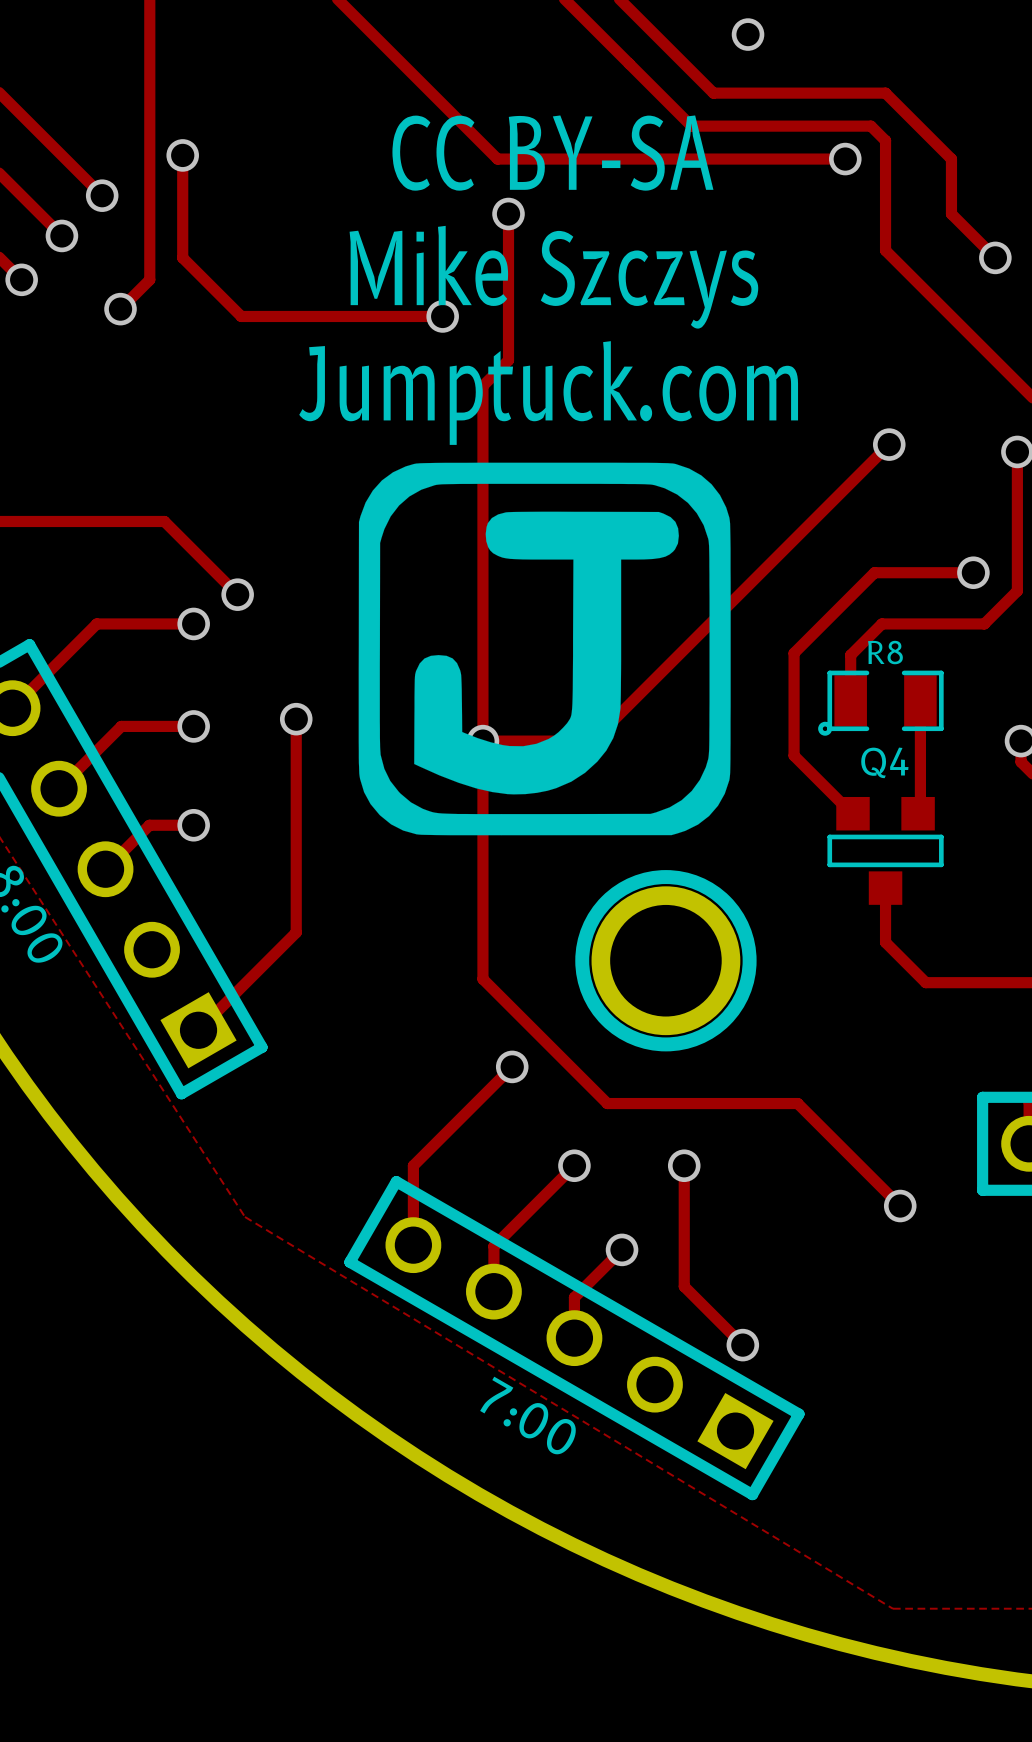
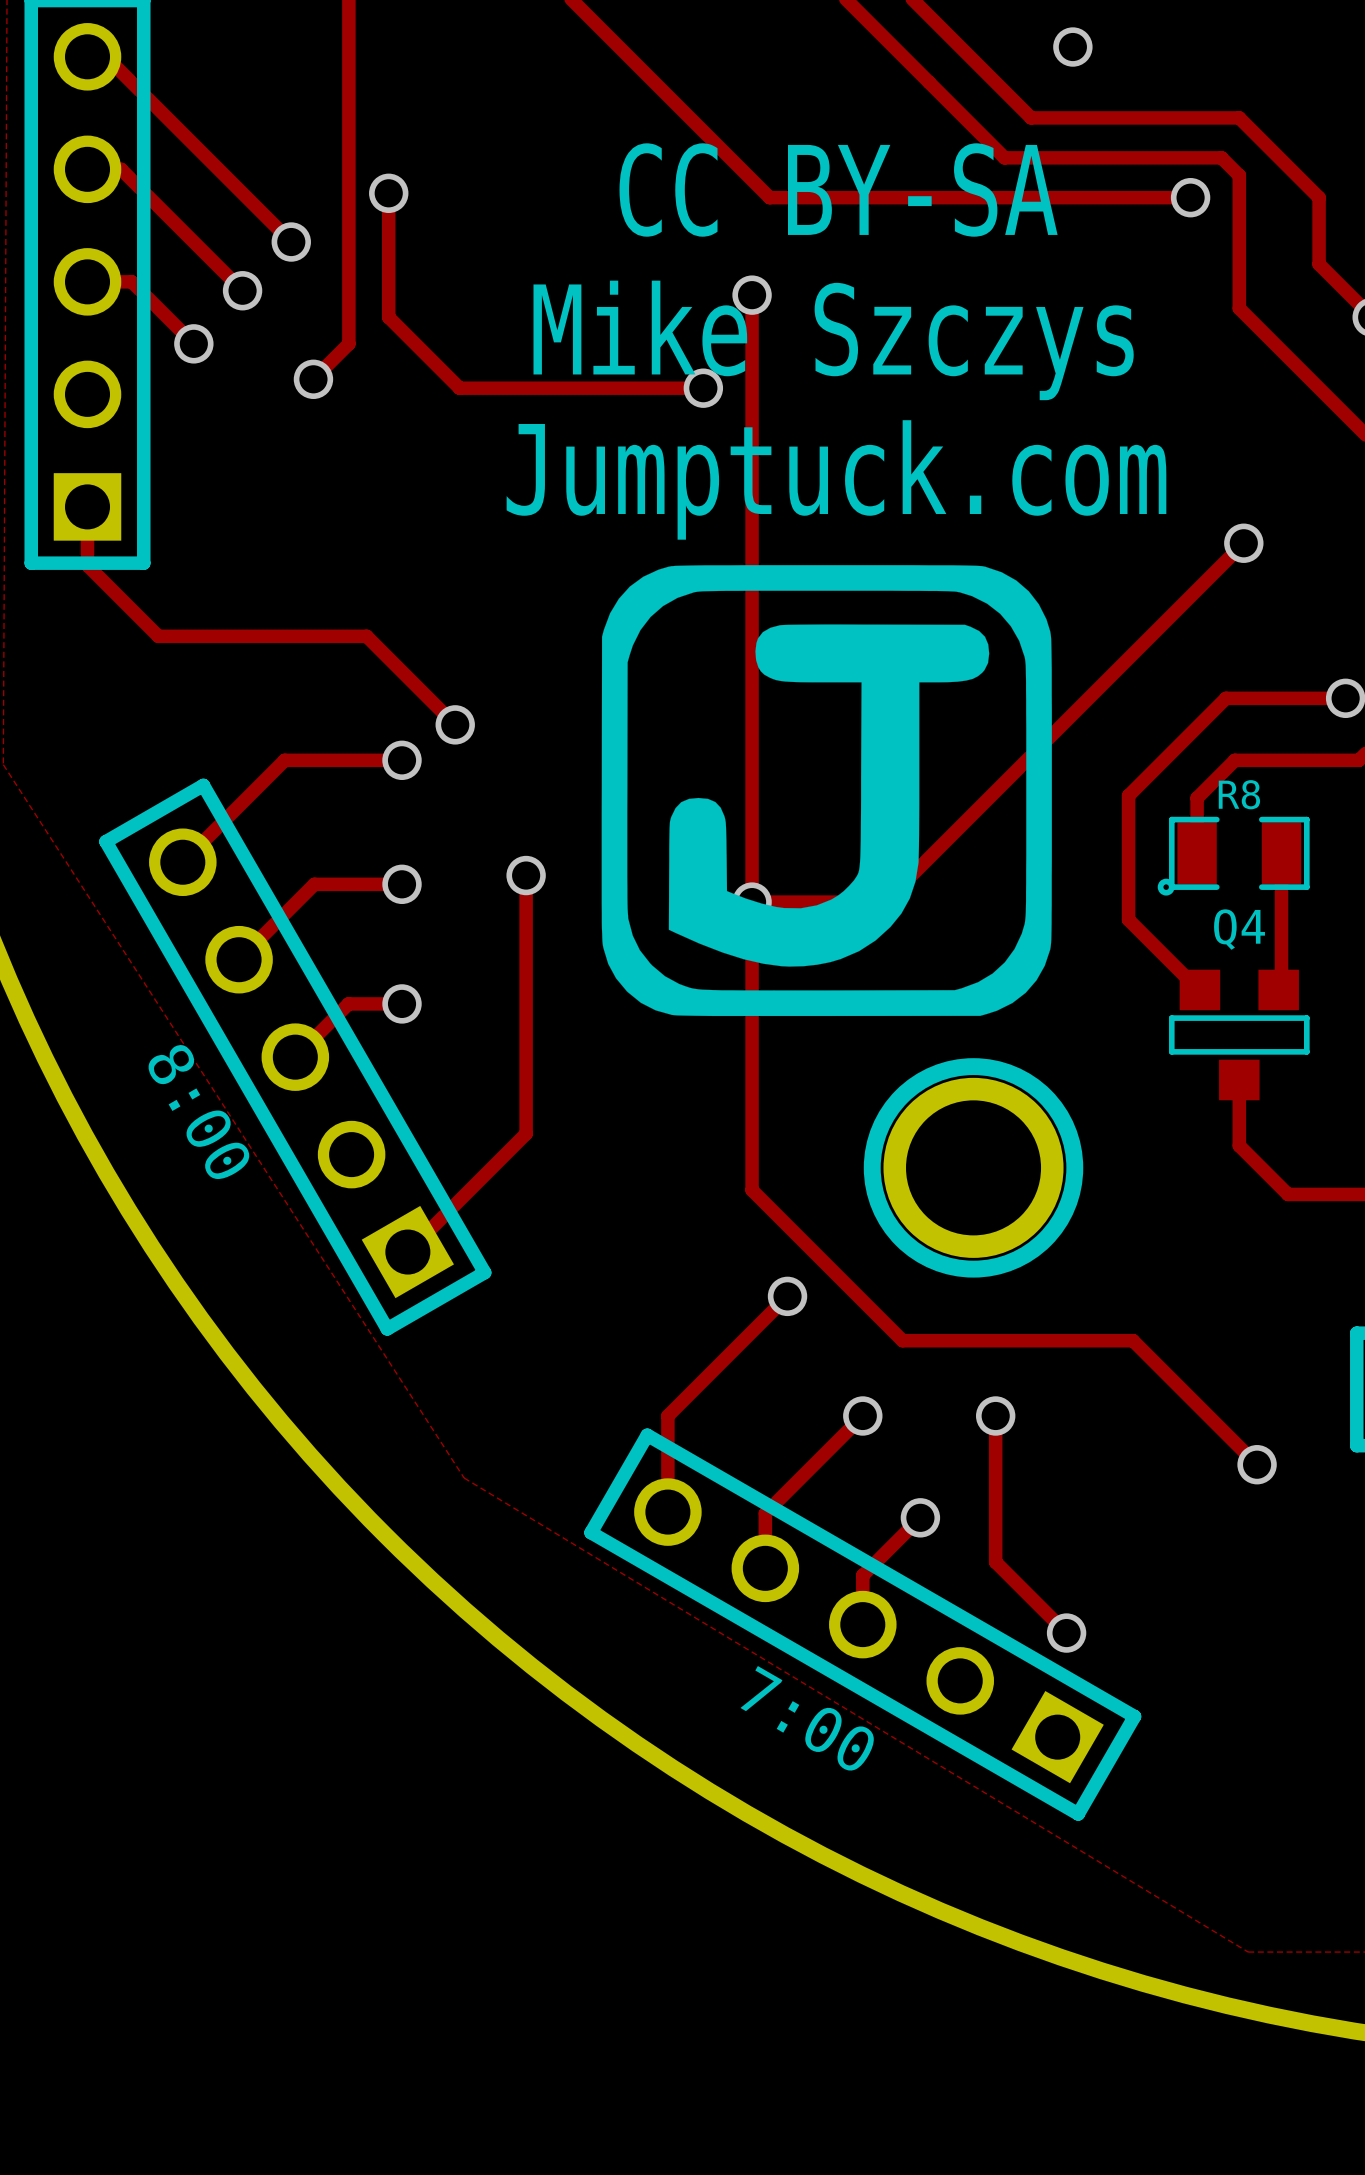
track: (508, 214) (508, 360) (482, 385) -> (752, 295) (752, 472)
via position: (508, 214) -> (752, 295)

